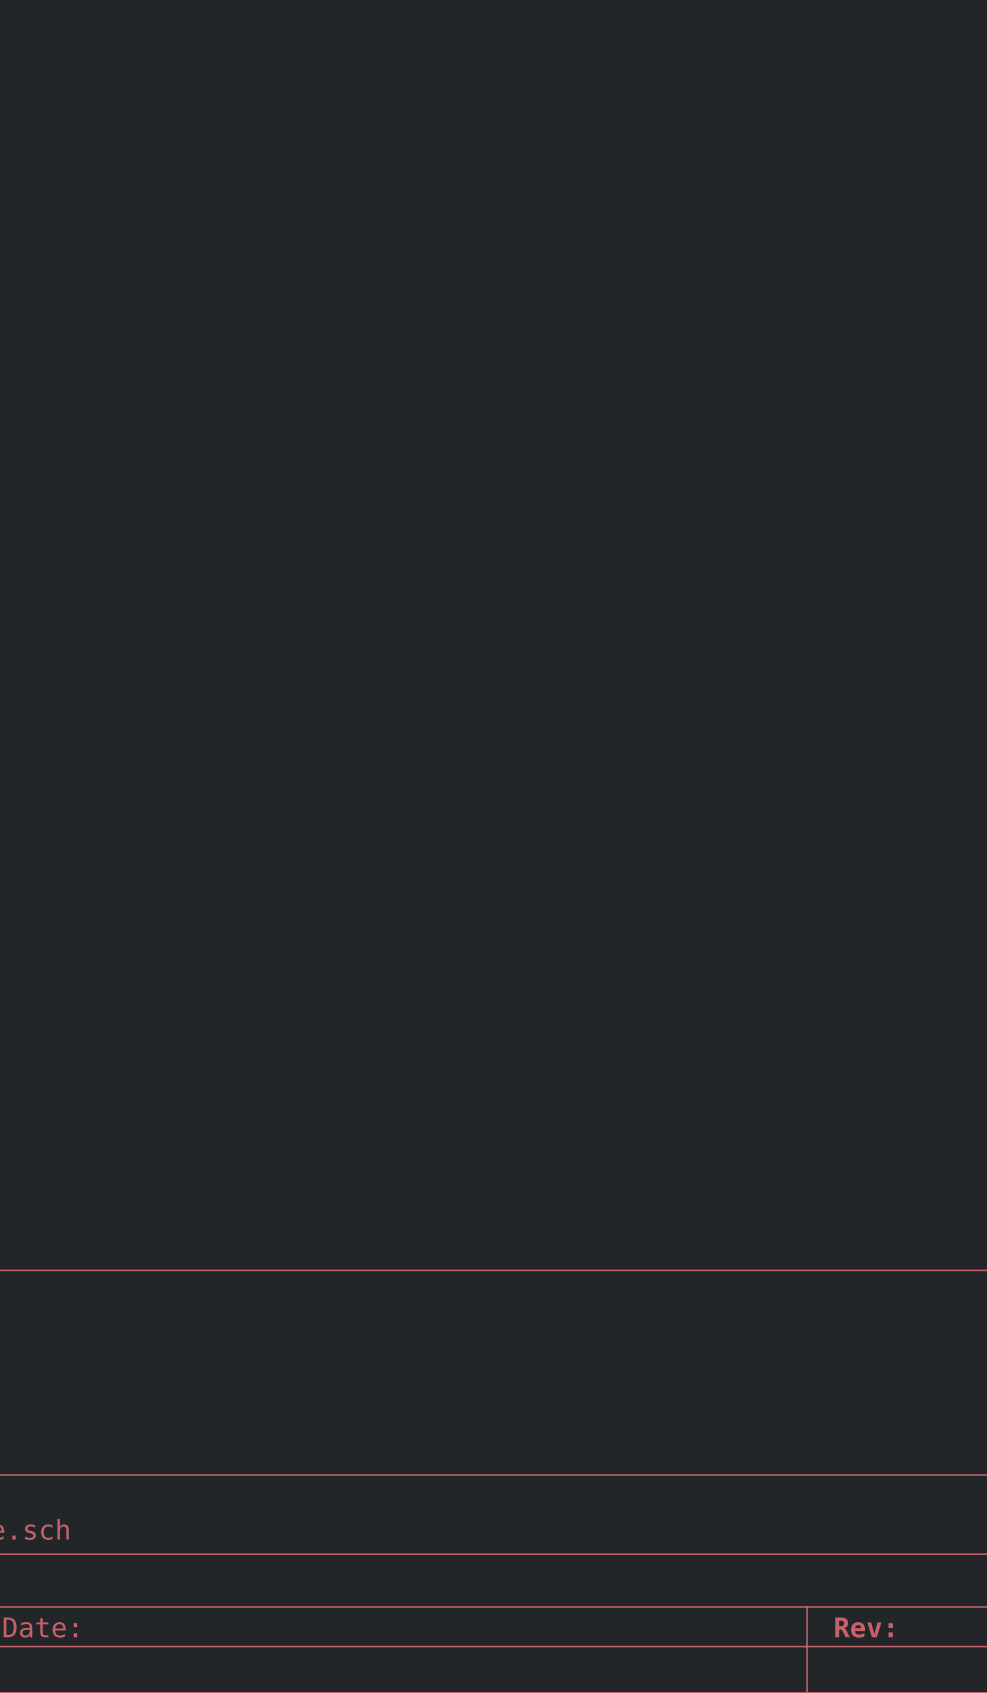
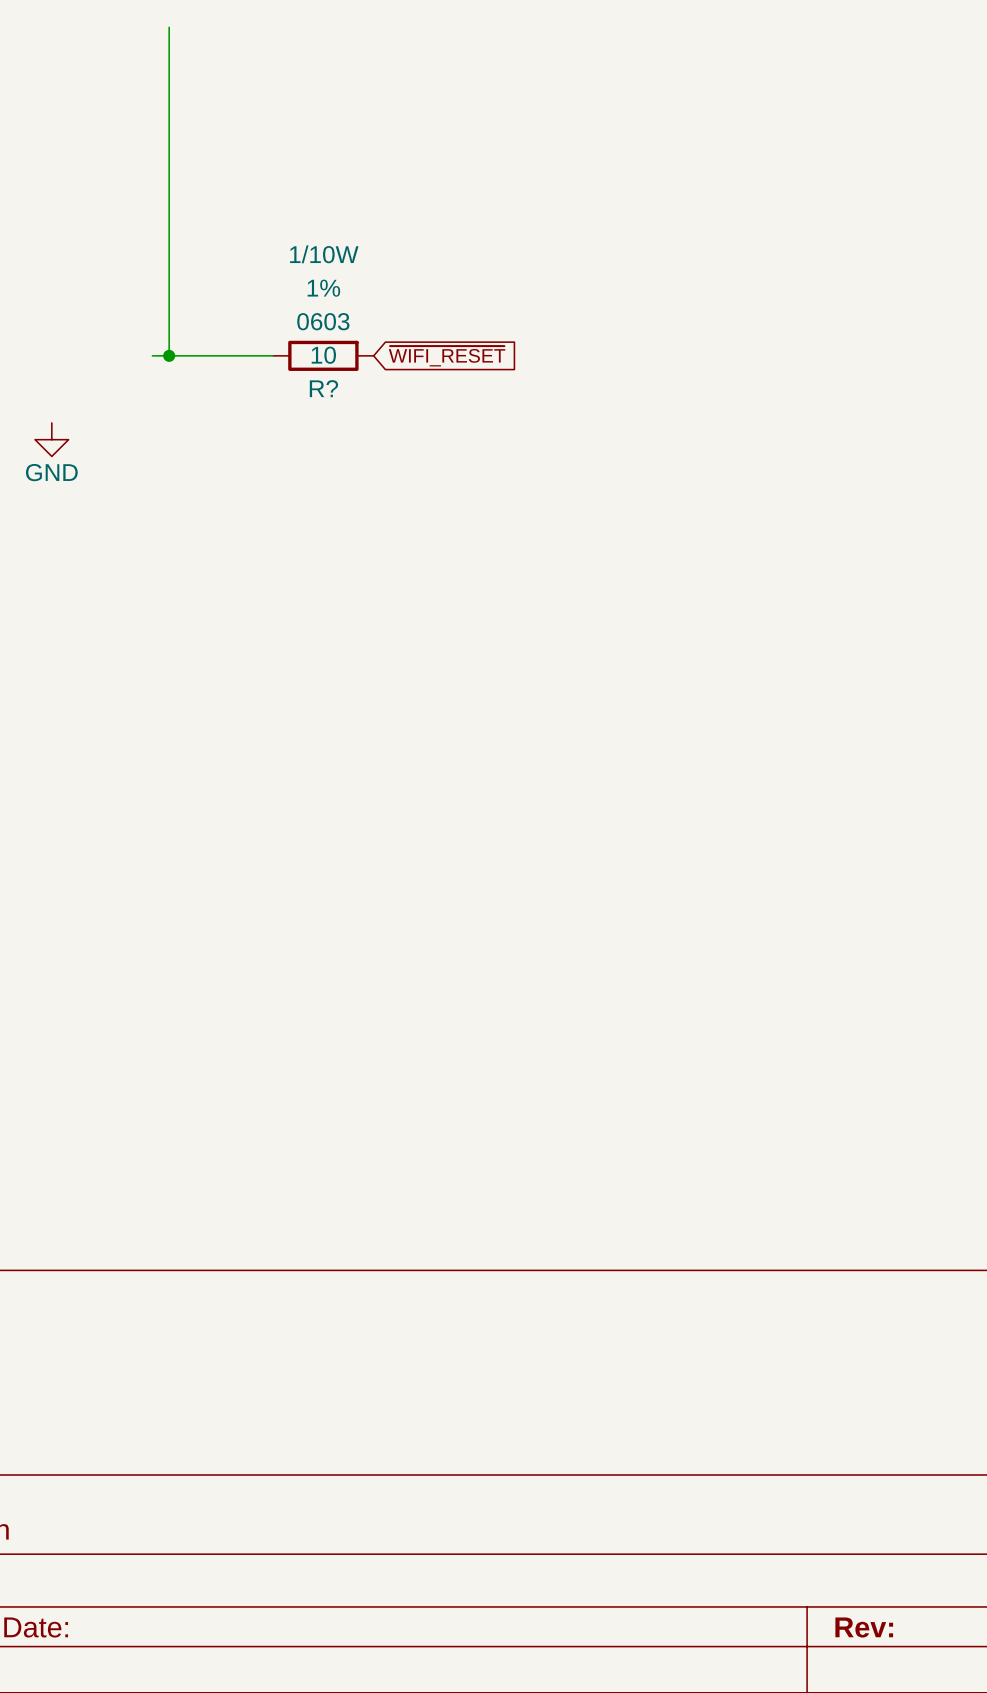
wire: none -> (169, 27) (169, 355)
wire: none -> (152, 355) (273, 355)
junction: none -> (169, 355)
R?: none -> 10 (323, 355)
global label: none -> ~{WIFI_RESET} (447, 356)
power symbol: none -> GND (51, 439)

